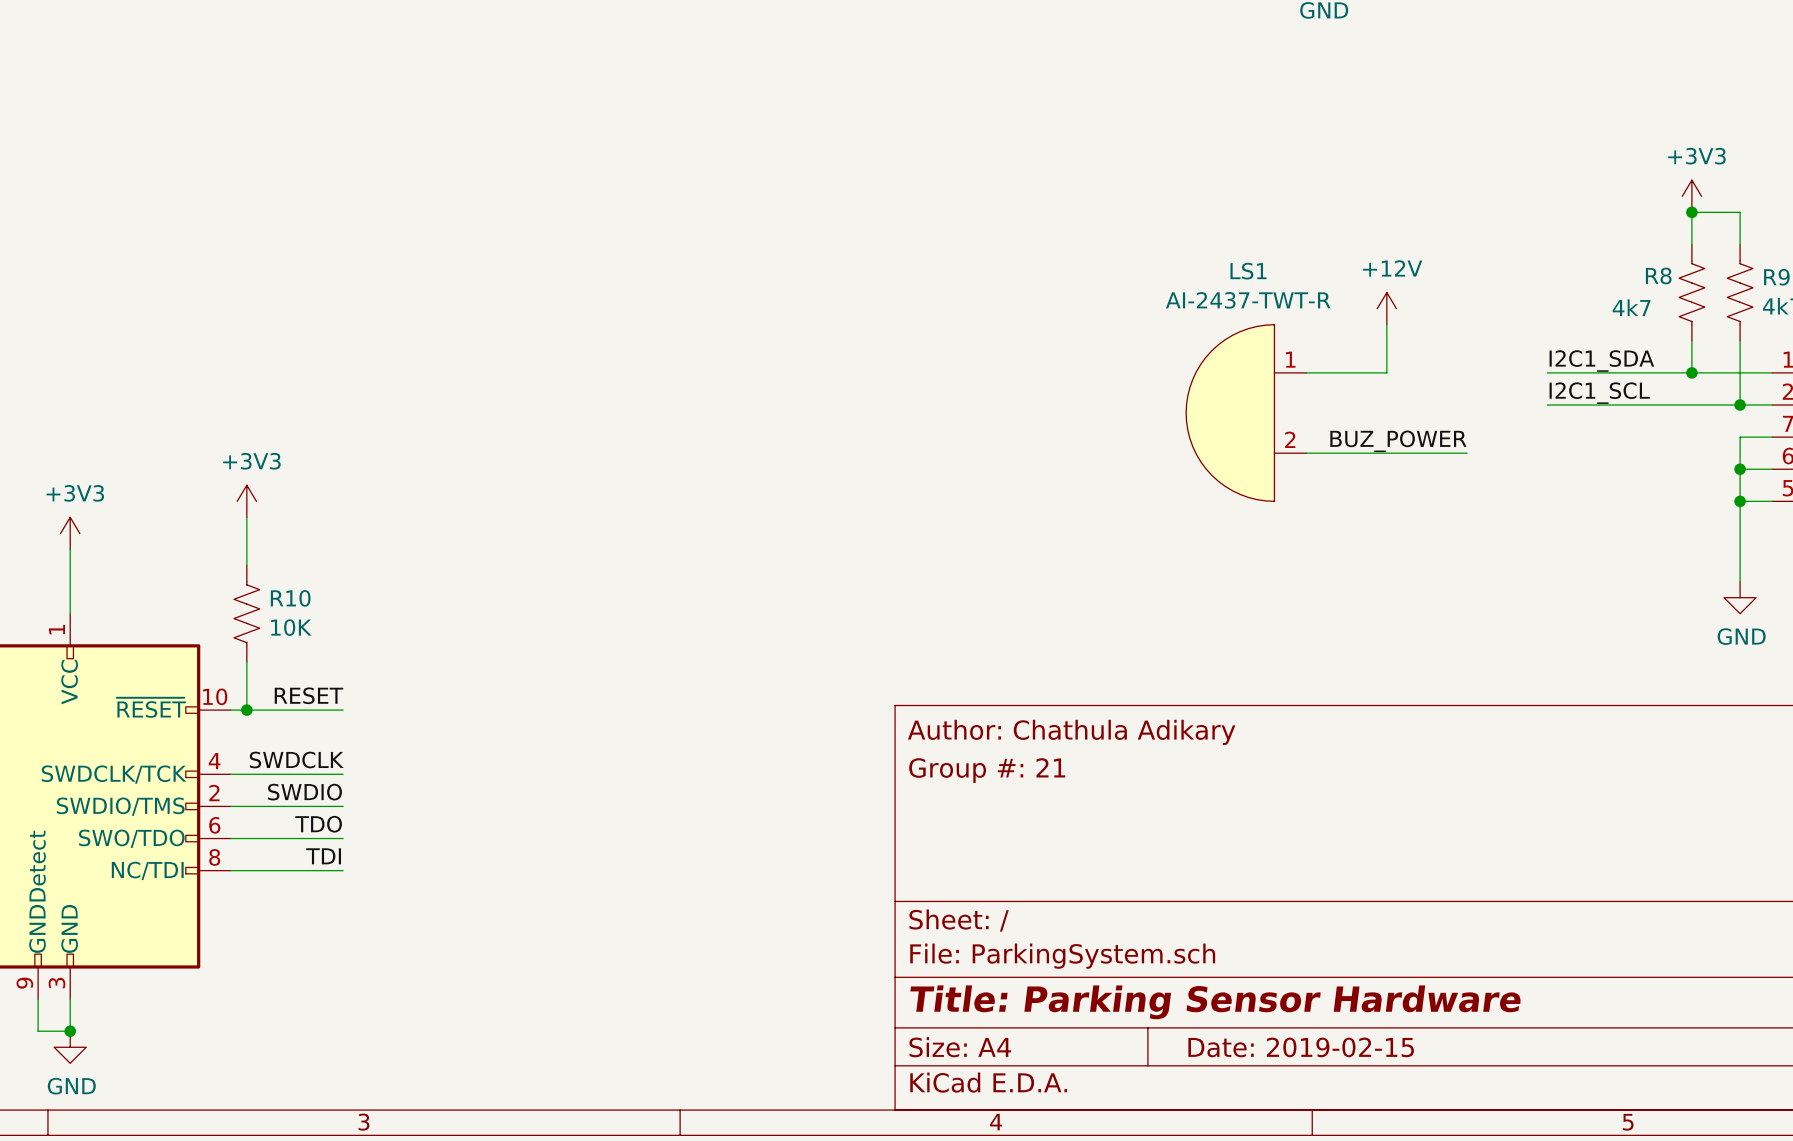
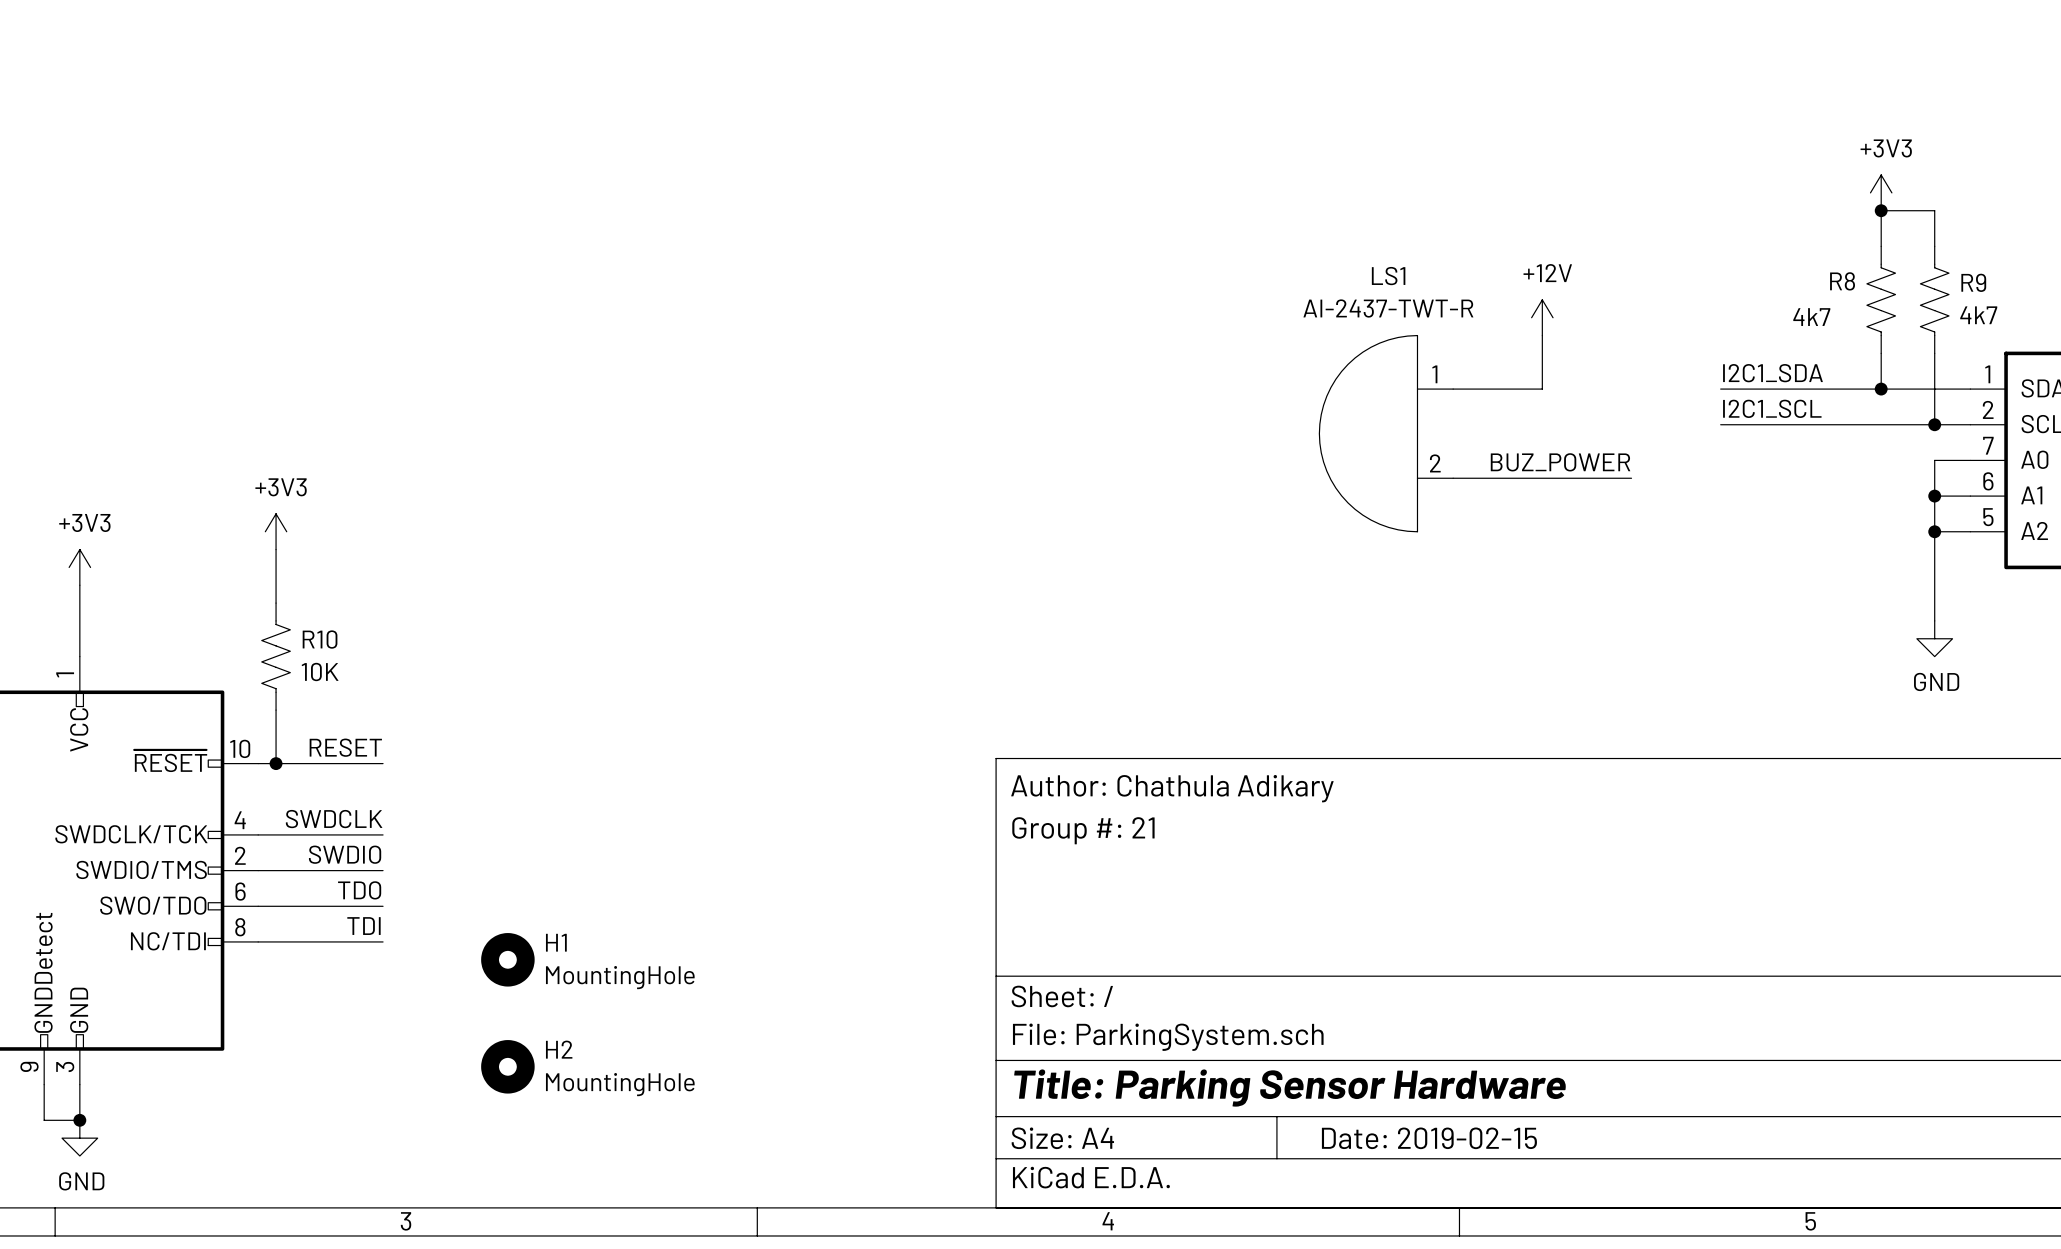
H1: none -> MountingHole (507, 959)
H2: none -> MountingHole (507, 1066)

